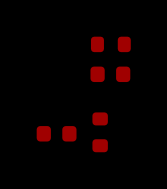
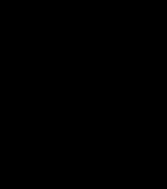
part: (110, 44) -> none
part: (110, 74) -> none
part: (100, 132) -> none
part: (56, 133) -> none

